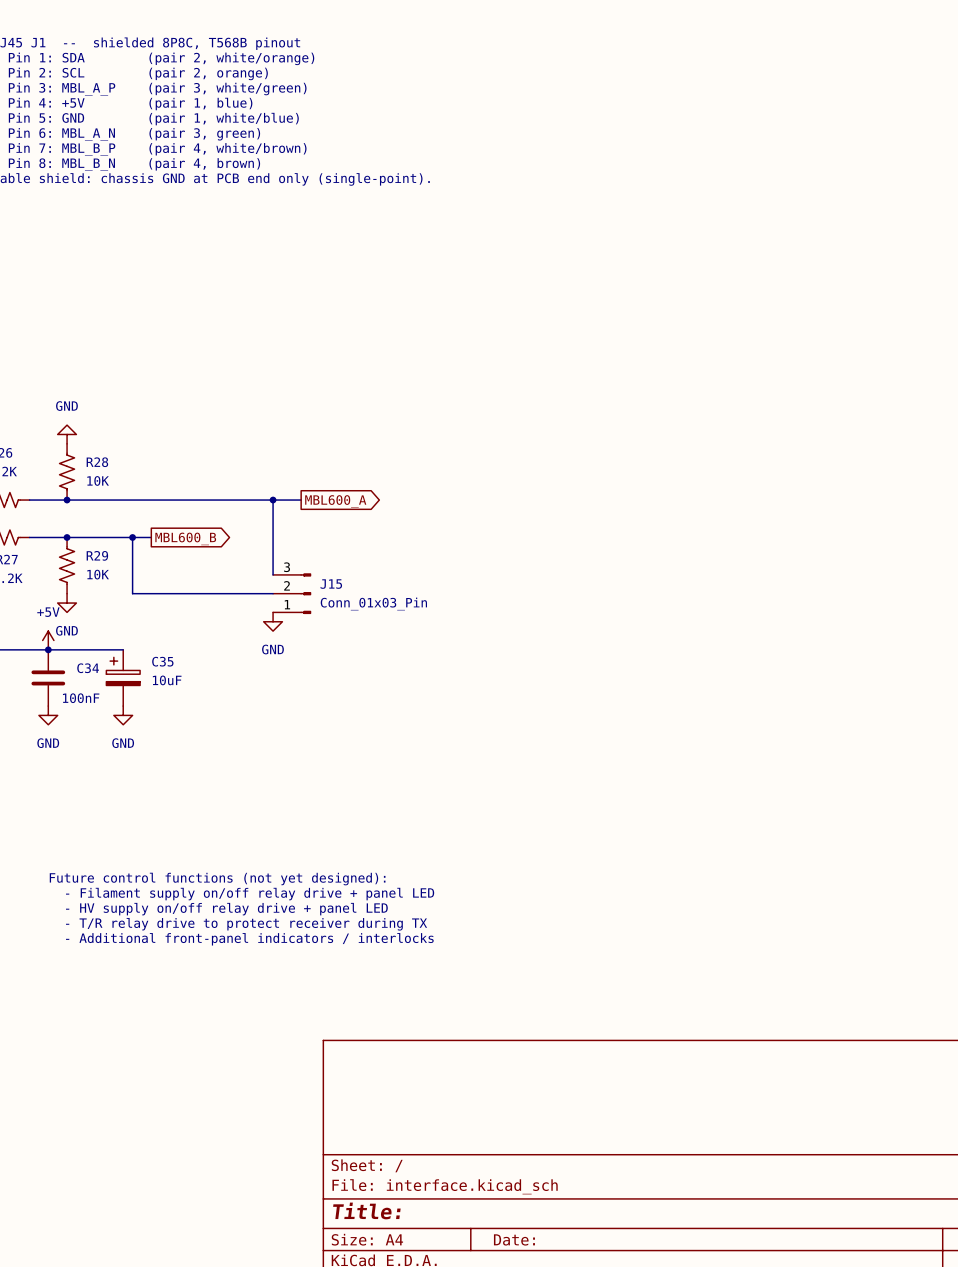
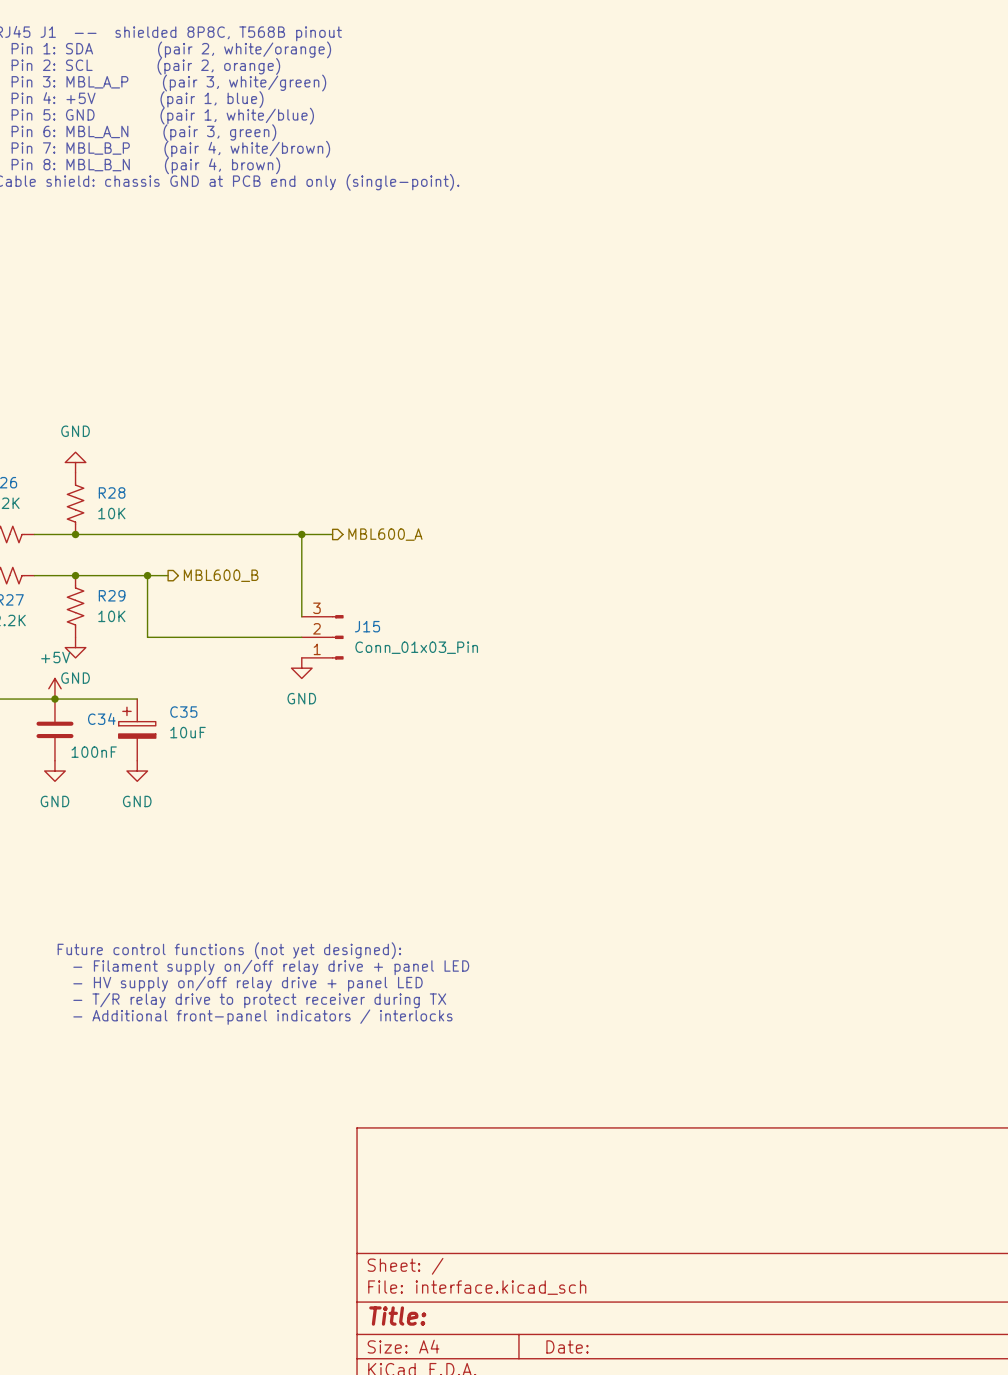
global label: MBL600_A (335, 501) -> none
hierarchical label: none -> MBL600_A (385, 534)
global label: MBL600_B (185, 538) -> none
hierarchical label: none -> MBL600_B (221, 575)

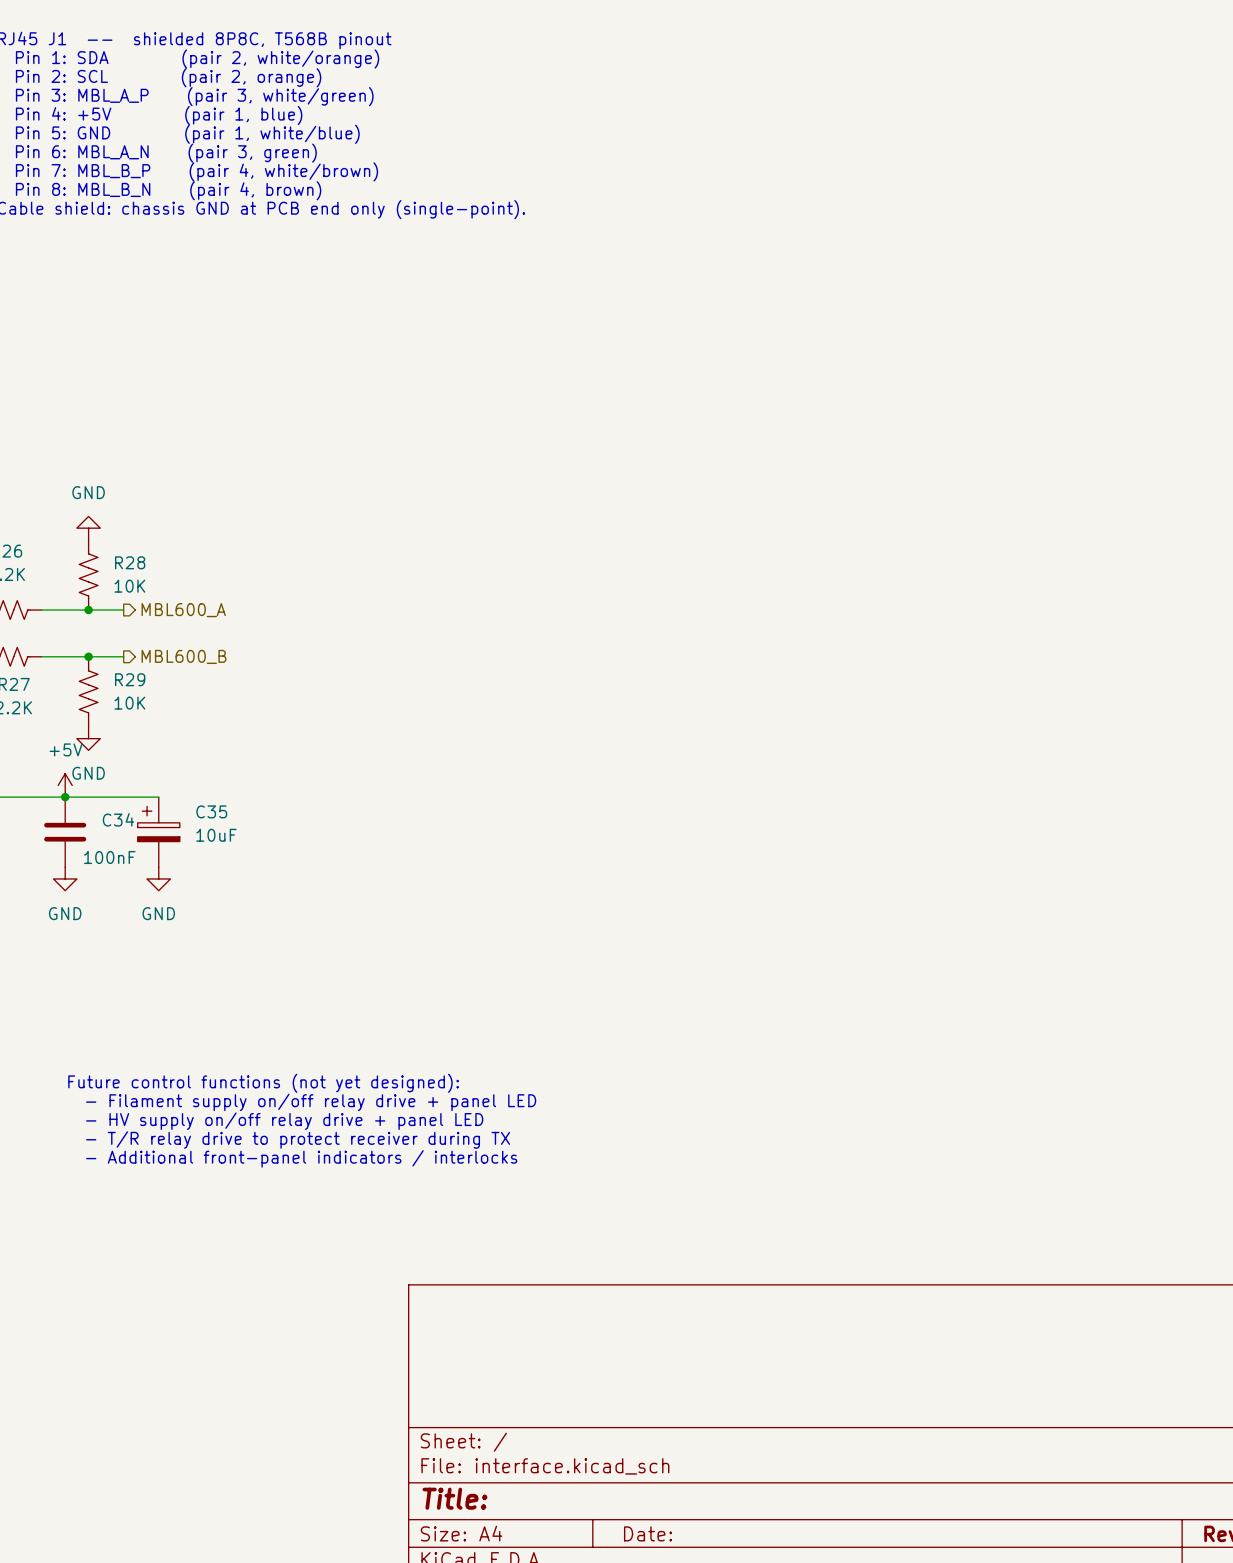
wire: (106, 534) (332, 534) -> none
hierarchical label: none -> MBL600_A (183, 610)
wire: (301, 534) (301, 616) -> none
junction: (301, 534) -> none
hierarchical label: MBL600_A (385, 534) -> none
wire: (106, 575) (168, 575) -> none
wire: (147, 575) (147, 637) (301, 637) -> none
junction: (147, 575) -> none
hierarchical label position: MBL600_B (221, 575) -> MBL600_B (184, 656)
J15: Conn_01x03_Pin (322, 637) -> none
power symbol: GND (301, 668) -> none

